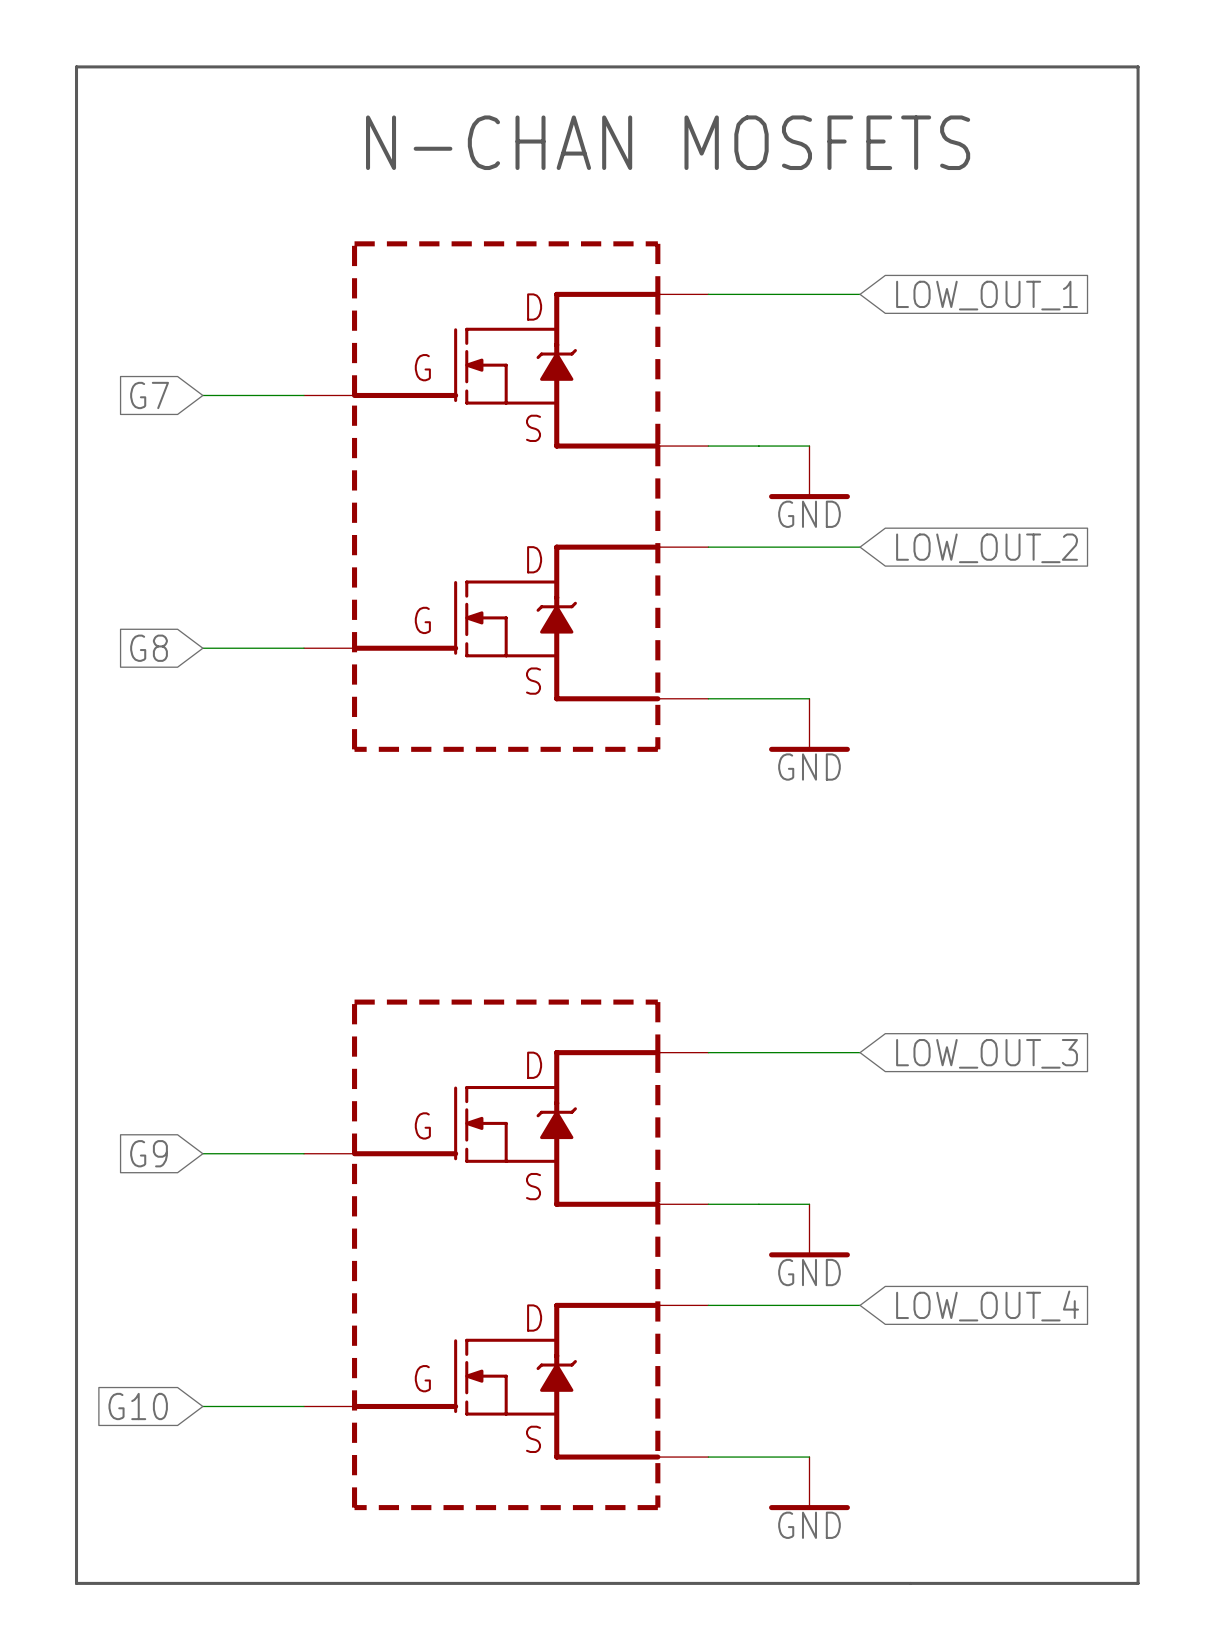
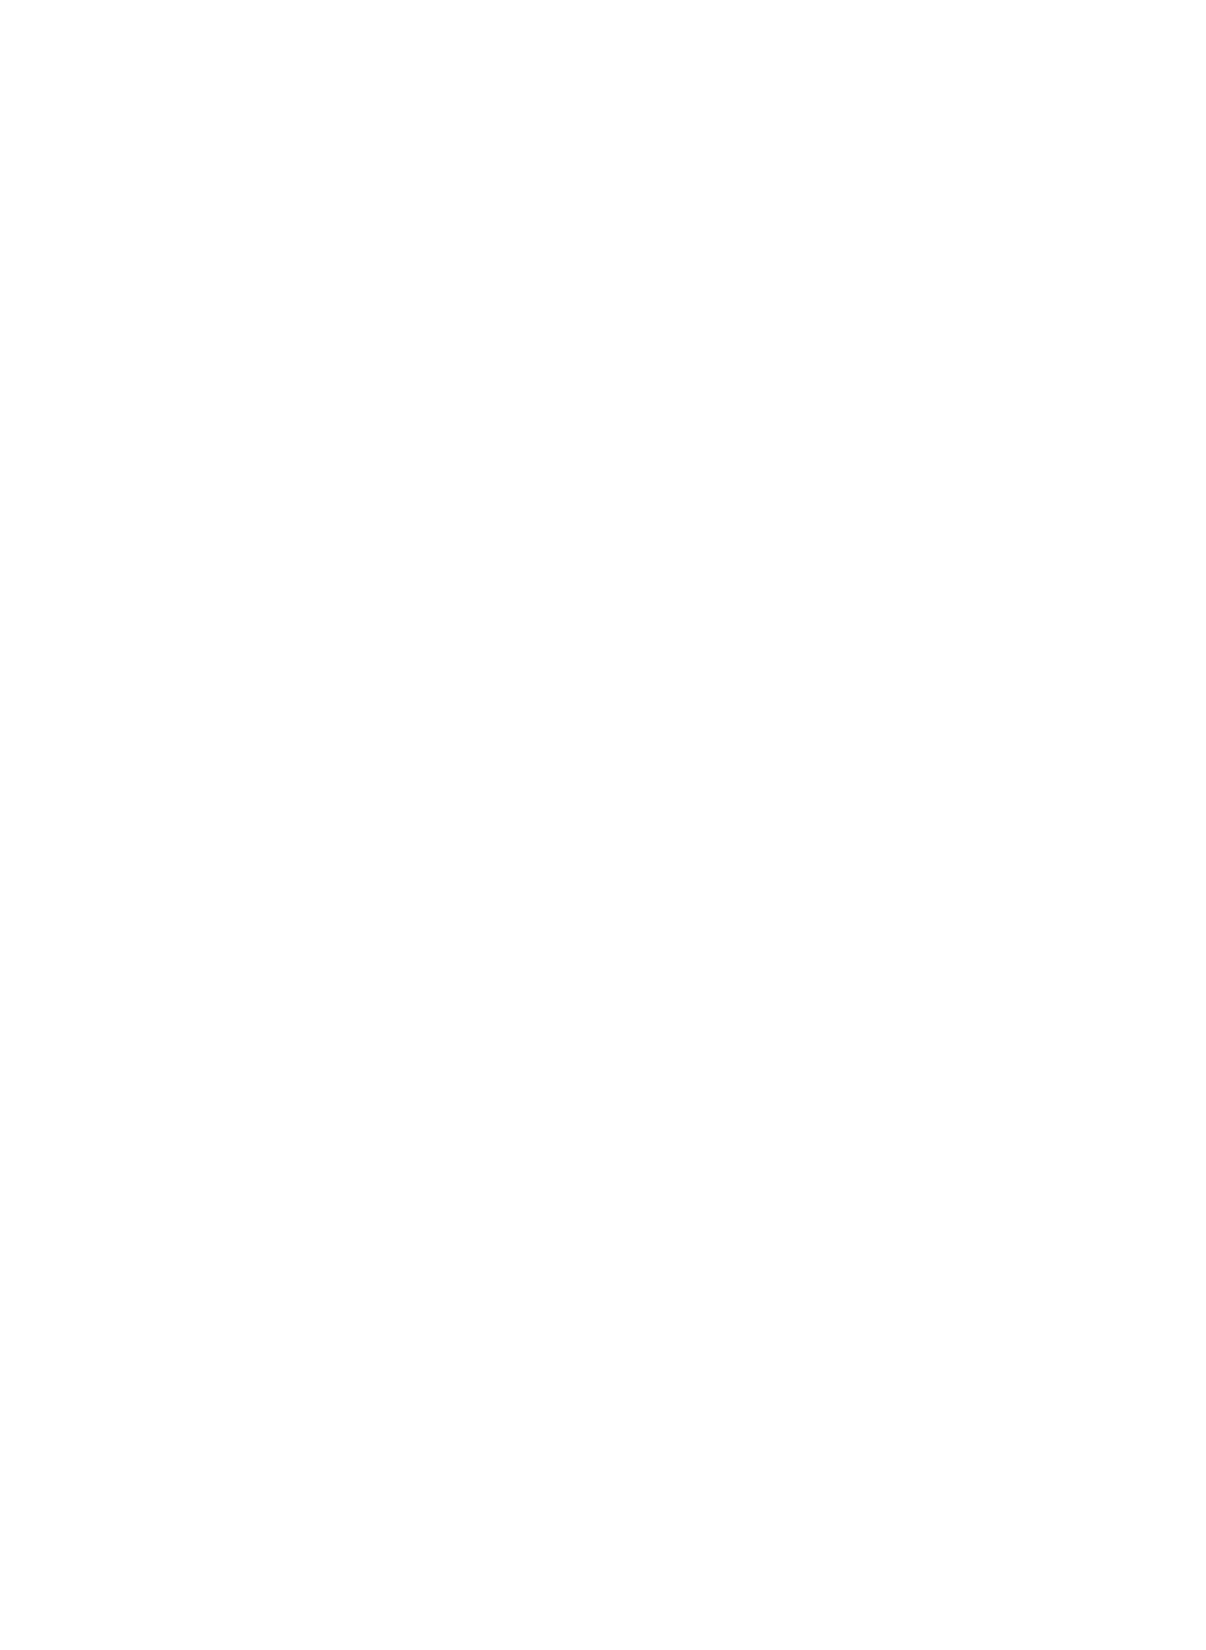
line: (76, 66) (1138, 66) (1138, 1583) (76, 1583) (76, 66) -> none
text: N-CHAN MOSFETS (668, 142) -> none
wire: (708, 294) (860, 294) -> none
global label: LOW_OUT_1 (987, 295) -> none
global label: G7 (149, 395) -> none
wire: (202, 395) (303, 395) -> none
wire: (708, 446) (809, 446) -> none
power symbol: GND (809, 472) -> none
part: (506, 496) -> none
wire: (708, 547) (860, 547) -> none
global label: LOW_OUT_2 (987, 548) -> none
global label: G8 (149, 648) -> none
wire: (202, 648) (303, 648) -> none
wire: (708, 698) (809, 698) -> none
power symbol: GND (809, 725) -> none
wire: (708, 1052) (860, 1052) -> none
global label: LOW_OUT_3 (987, 1053) -> none
global label: G9 (149, 1153) -> none
wire: (202, 1153) (303, 1153) -> none
wire: (708, 1204) (809, 1204) -> none
power symbol: GND (809, 1230) -> none
part: (506, 1254) -> none
wire: (708, 1305) (860, 1305) -> none
global label: LOW_OUT_4 (987, 1305) -> none
global label: G10 (138, 1406) -> none
wire: (202, 1406) (303, 1406) -> none
wire: (708, 1457) (809, 1457) -> none
power symbol: GND (809, 1483) -> none

